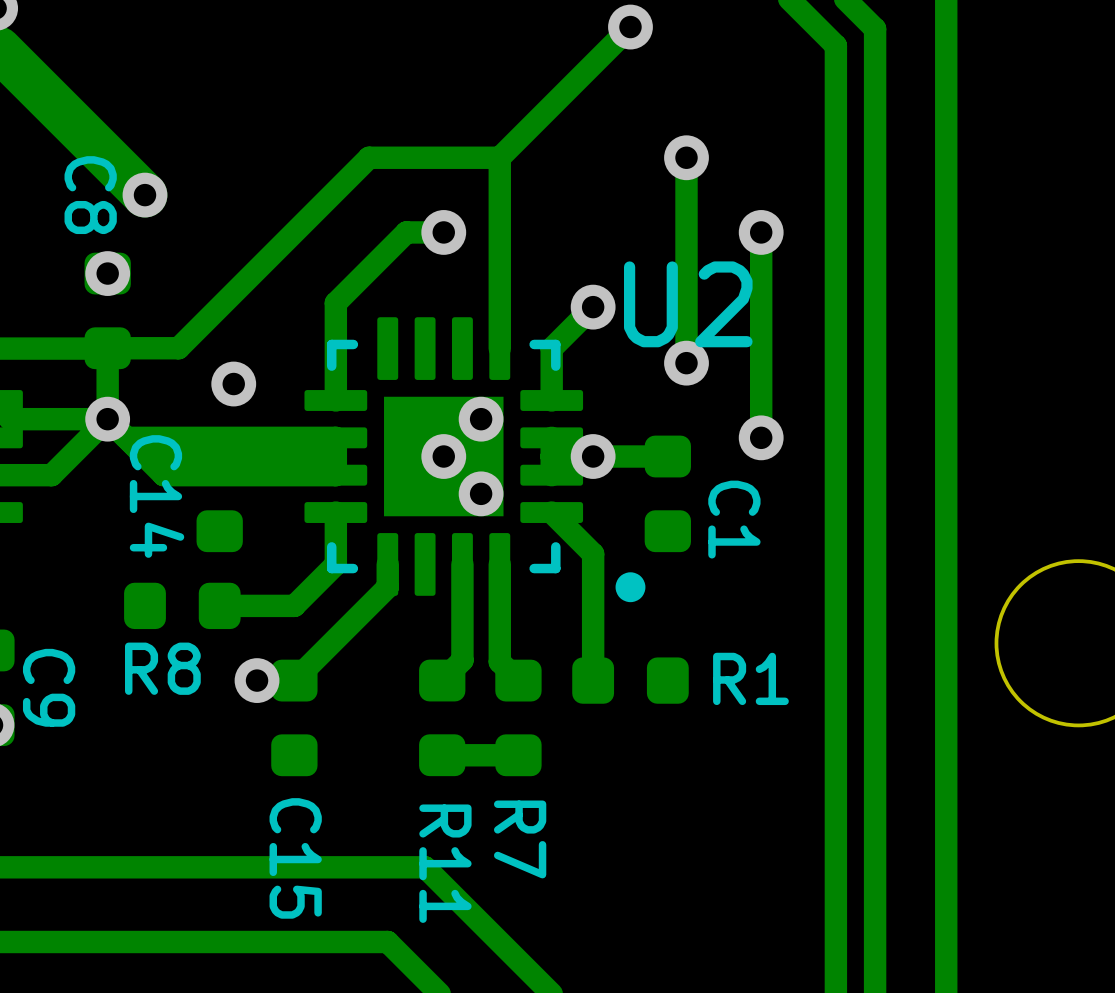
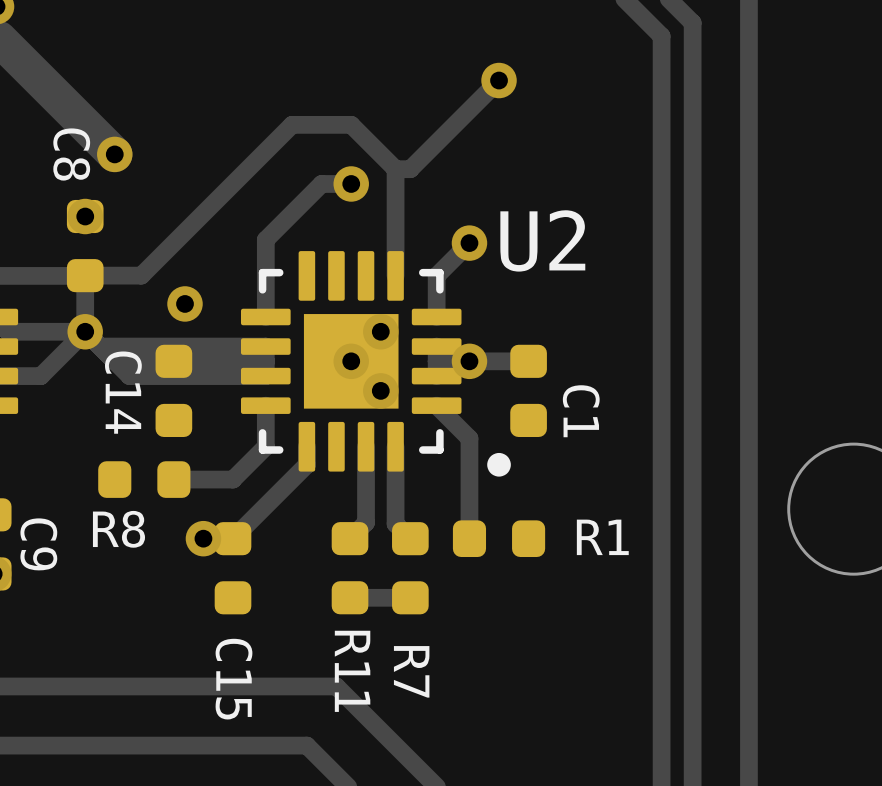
track: (630, 27) (499, 157) -> none
via: (630, 27) -> none
via: none -> (499, 80)
track: (499, 157) (443, 157) -> (499, 80) (410, 169) (395, 169) (351, 124)
track: (499, 157) (499, 213) -> none
track: (686, 157) (686, 363) -> none
via: (686, 157) -> none
track: (761, 232) (761, 437) -> none
via: (761, 232) -> none
via: (686, 363) -> none
via: (761, 437) -> none

